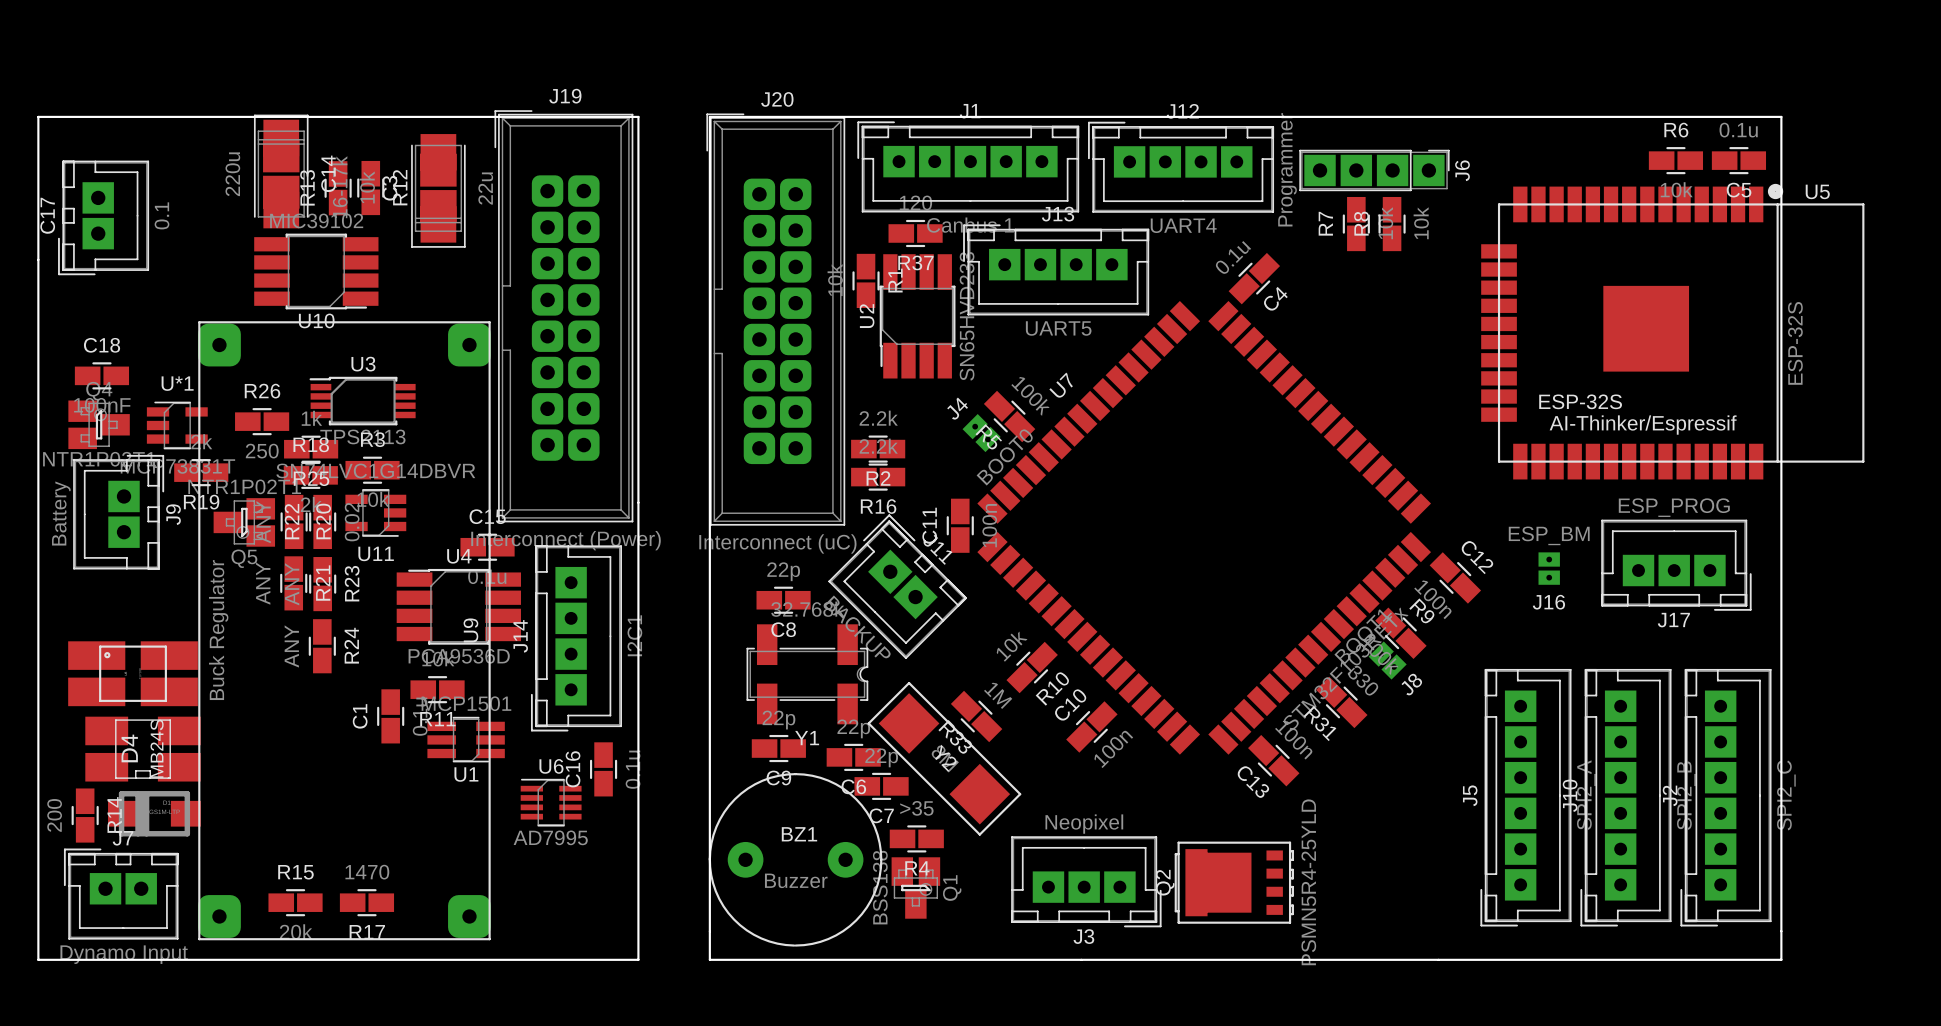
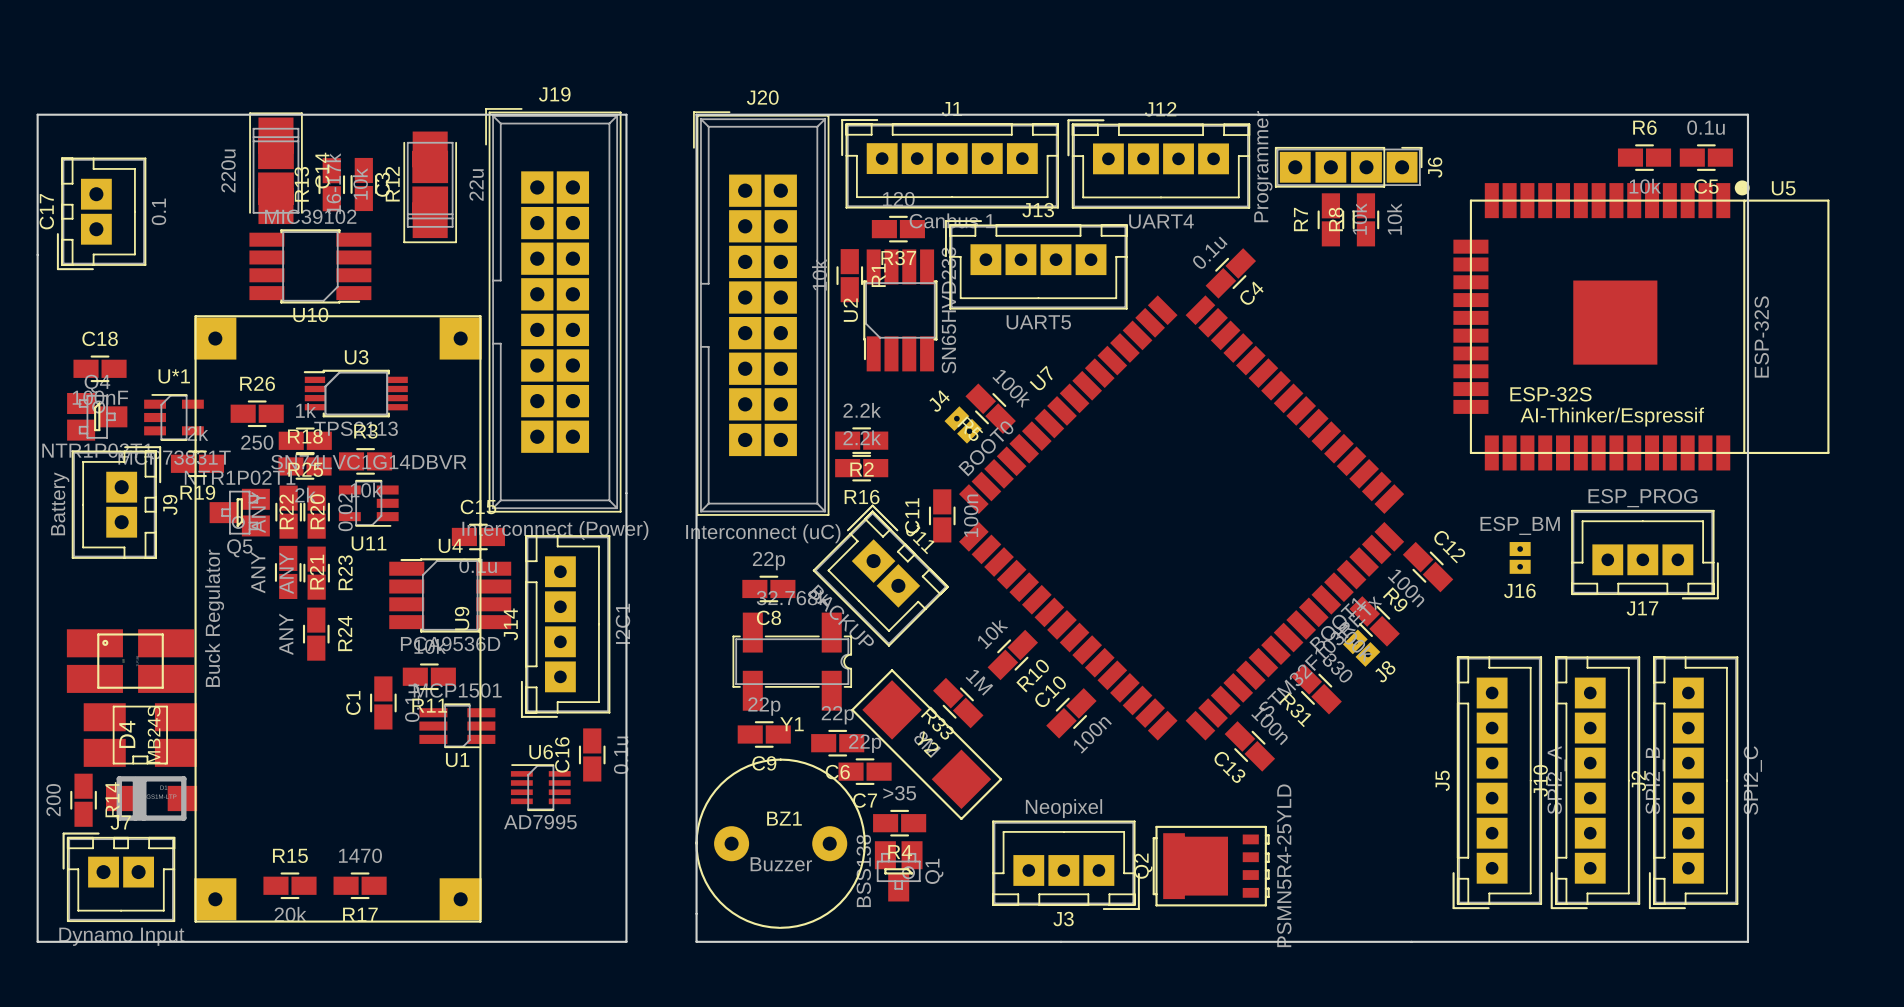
J19 footprint: [494, 110, 634, 523] -> [485, 108, 622, 513]
J20 footprint: [706, 113, 846, 526] -> [693, 111, 830, 516]
U9 footprint: [198, 321, 491, 941] -> [194, 315, 482, 923]

